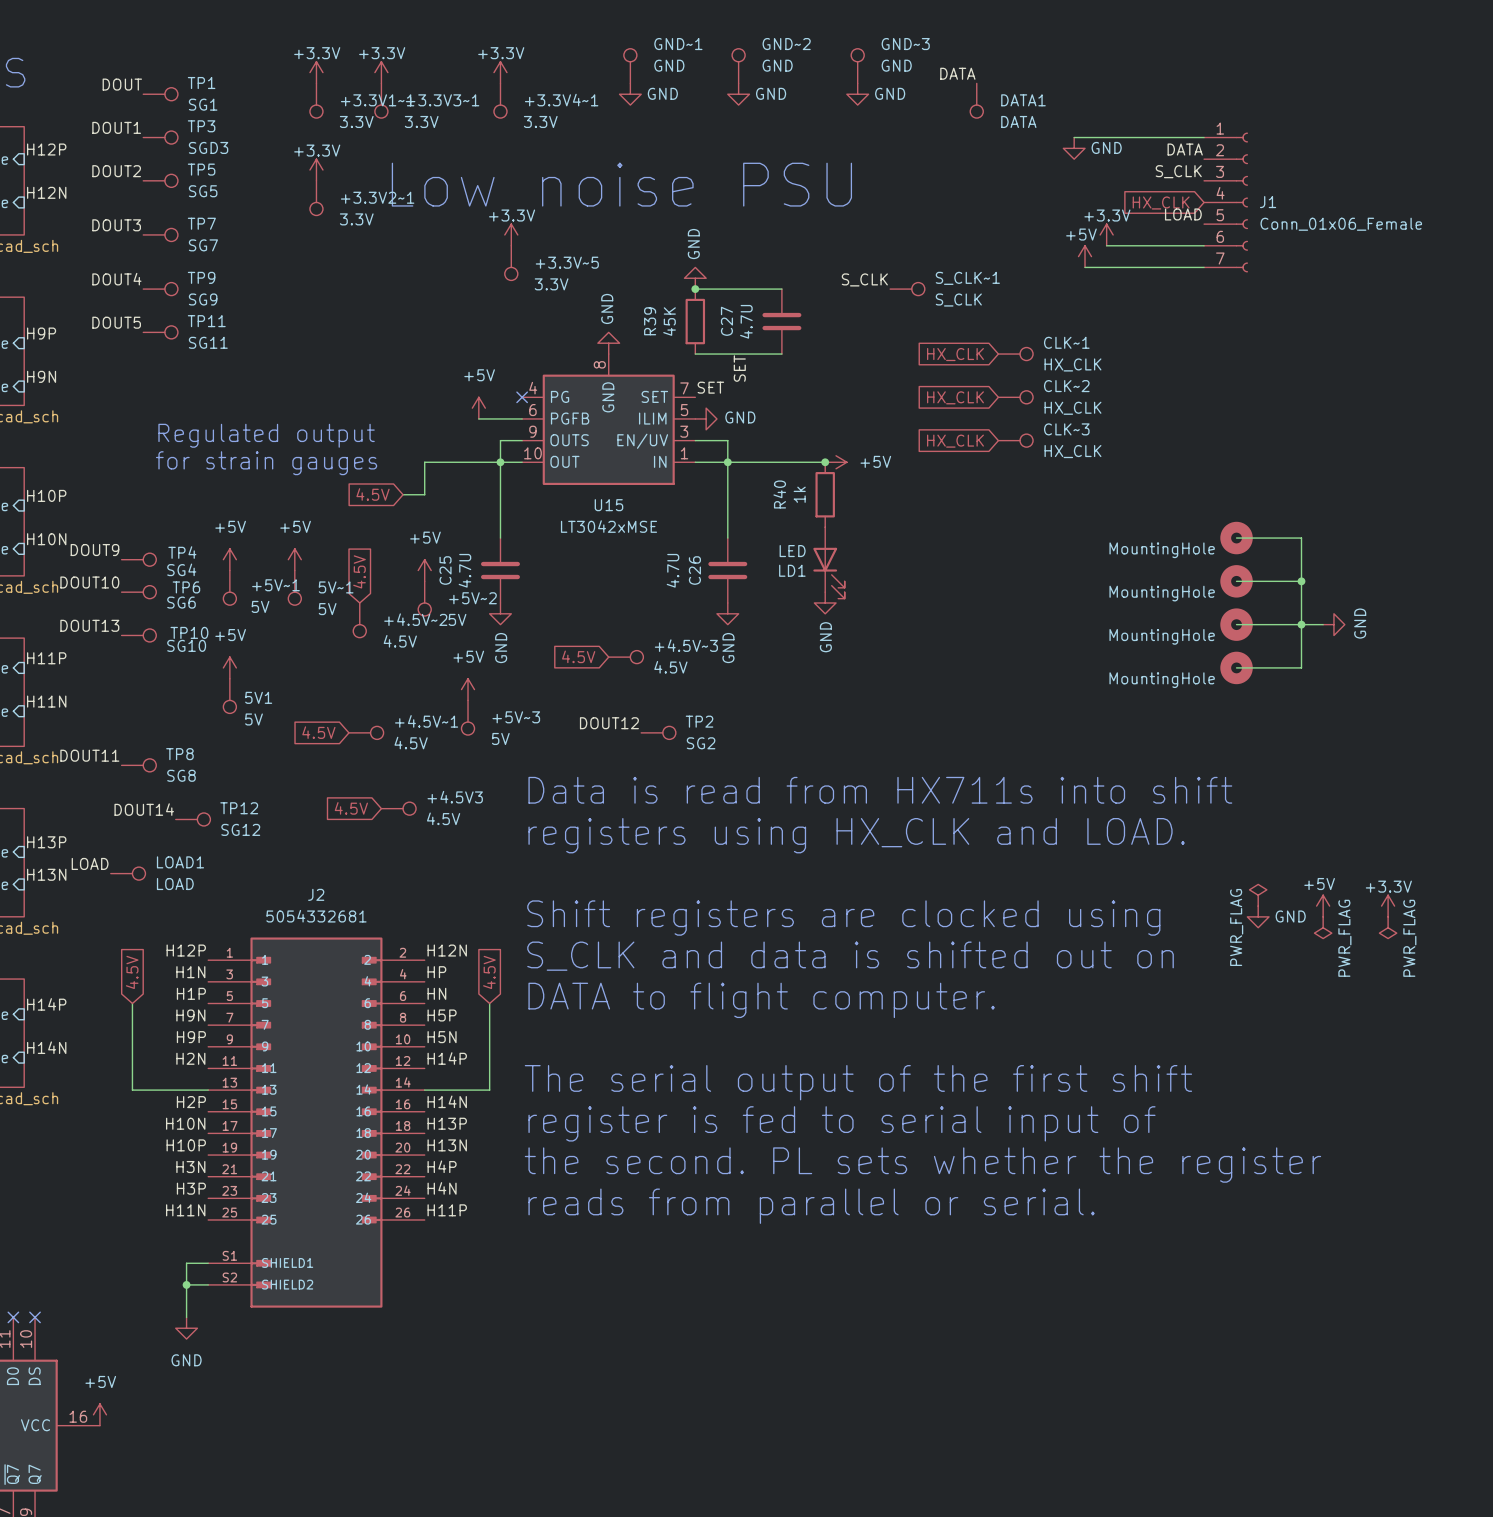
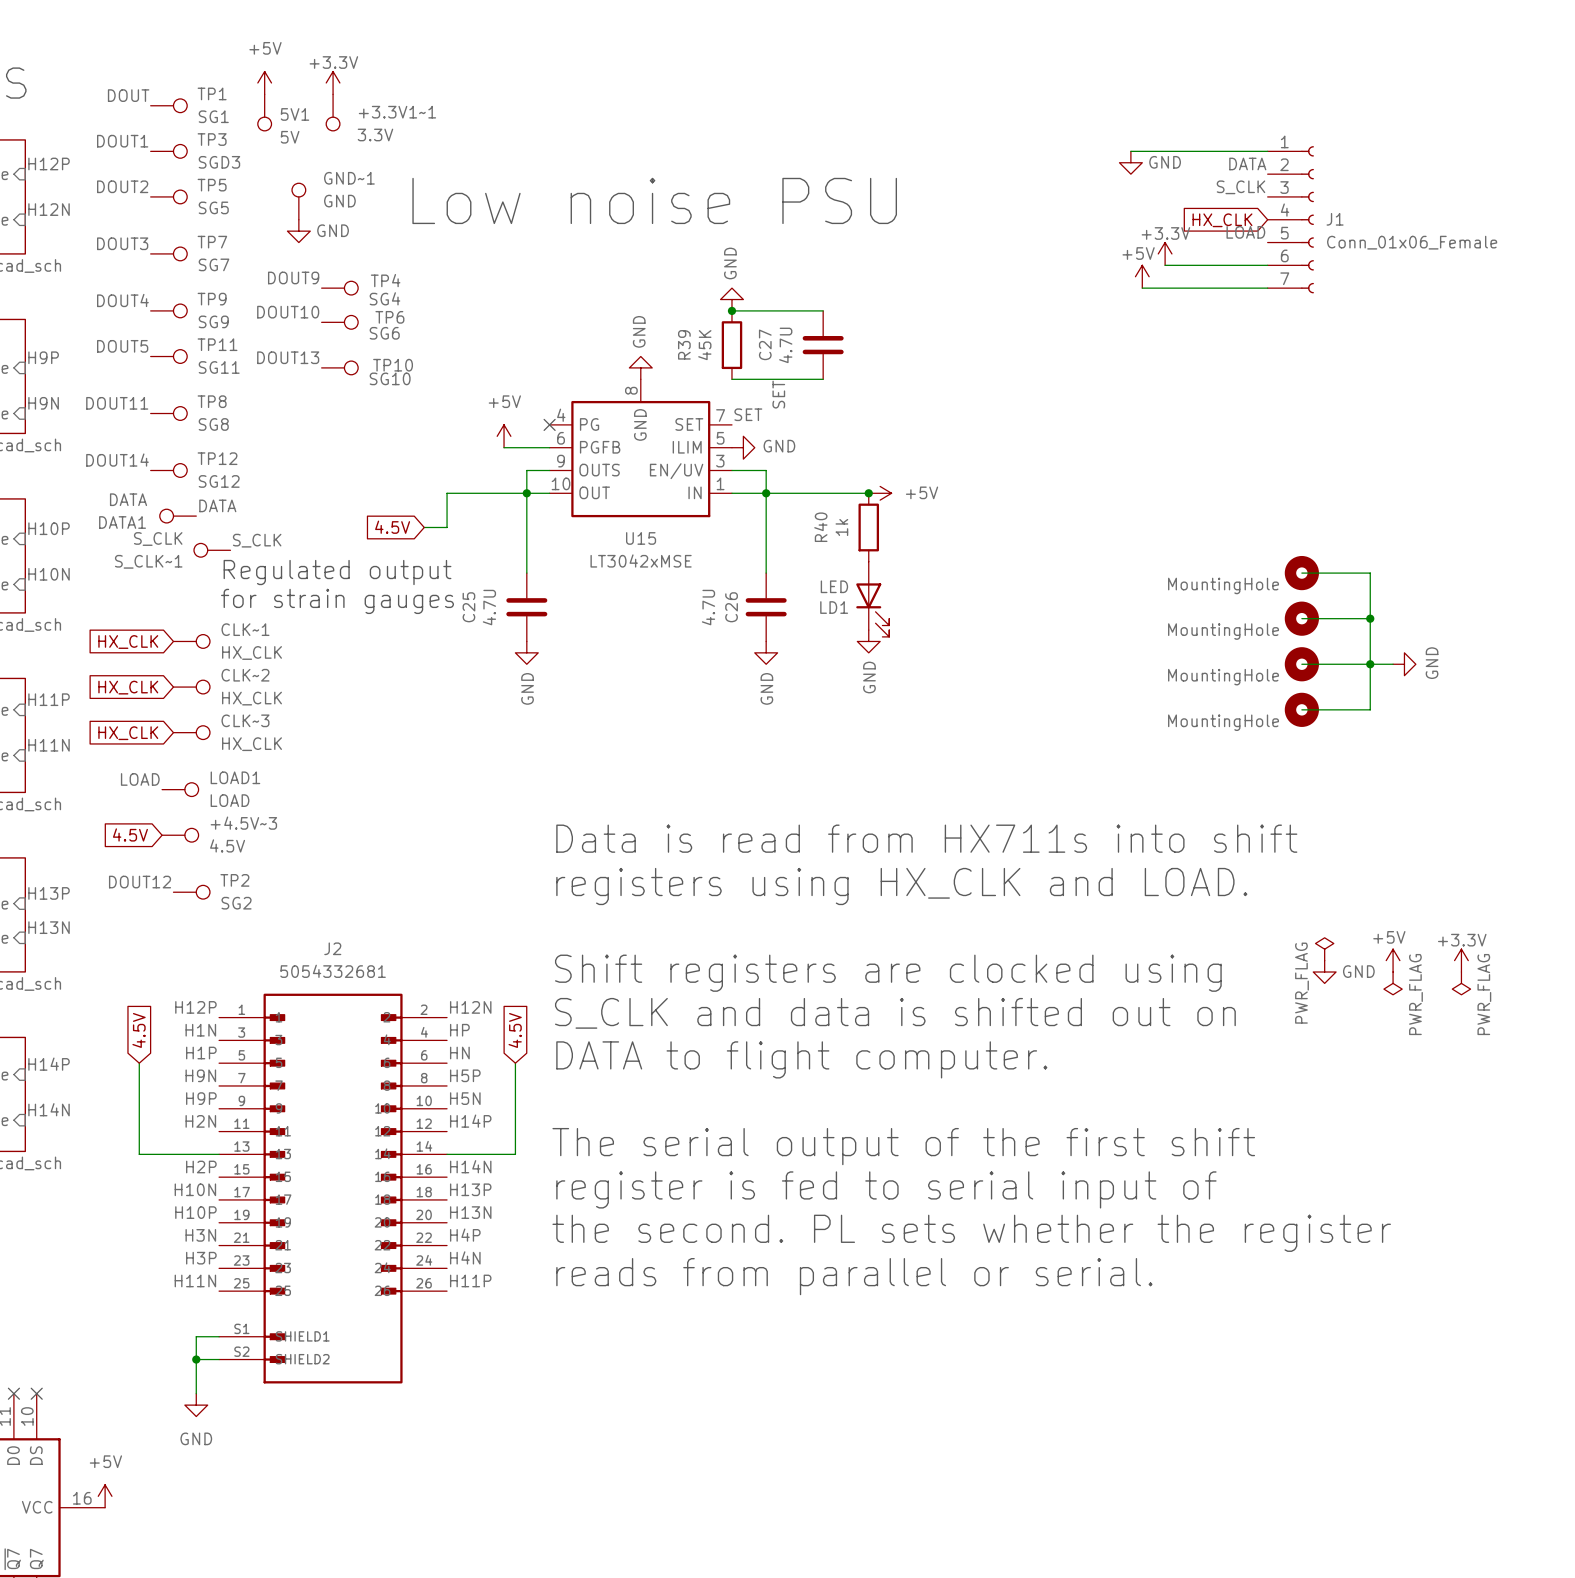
GND~1 position: (630, 66) -> (298, 201)
GND~2: GND (738, 66) -> none
GND~3: GND (857, 66) -> none
power symbol: none -> +5V (264, 82)
power symbol: +3.3V (381, 72) -> none
power symbol: +3.3V (500, 72) -> none
label: DATA (957, 73) -> none
power symbol: GND (630, 94) -> none
power symbol: GND (738, 94) -> none
power symbol: GND (857, 94) -> none
+3.3V3~1: 3.3V (381, 100) -> none
+3.3V4~1: 3.3V (500, 100) -> none
DATA1 position: (976, 100) -> (178, 516)
DATA1 name position: DATA1 (1023, 100) -> DATA1 (122, 522)
DATA1 rotation: 0° (976, 111) -> 90° clockwise (166, 516)
DATA1 value position: DATA (1018, 121) -> DATA (128, 499)
power symbol: +3.3V (316, 170) -> none
+3.3V2~1: 3.3V (316, 198) -> none
power symbol: none -> GND (298, 231)
power symbol: +3.3V (511, 234) -> none
label: none -> DOUT9 (293, 277)
+3.3V~5: 3.3V (511, 263) -> none
label: S_CLK (864, 279) -> none
S_CLK~1 position: (907, 289) -> (212, 550)
S_CLK~1 rotation: 0° (918, 289) -> 180° (200, 550)
label: none -> DOUT10 (288, 312)
label: none -> DOUT13 (288, 357)
global label: HX_CLK (955, 354) -> none
CLK~1 position: (1015, 354) -> (191, 641)
label: none -> DOUT11 (117, 403)
global label: HX_CLK (955, 397) -> none
CLK~2 position: (1015, 397) -> (191, 687)
label: none -> DOUT14 (117, 460)
text position: Regulated output (266, 435) -> Regulated output (337, 572)
CLK~3 position: (1015, 440) -> (191, 732)
global label: HX_CLK (955, 441) -> none
text position: for strain gauges (266, 463) -> for strain gauges (337, 601)
label: none -> DATA (217, 505)
label: none -> S_CLK (257, 540)
label: DOUT9 (94, 550) -> none
TP4 position: (138, 559) -> (339, 288)
power symbol: +5V (229, 559) -> none
power symbol: +5V (294, 559) -> none
power symbol: +5V (424, 570) -> none
global label: 4.5V (359, 571) -> none
label: DOUT10 (89, 582) -> none
+5V~1: 5V (229, 587) -> none
5V~1: 5V (294, 587) -> none
TP6 position: (138, 592) -> (339, 322)
+5V~2: 5V (424, 598) -> none
global label: none -> HX_CLK (128, 642)
+4.5V~2: 4.5V (359, 620) -> none
label: DOUT13 (89, 625) -> none
TP10 position: (138, 635) -> (339, 367)
global label: none -> HX_CLK (128, 687)
global label: 4.5V (578, 656) -> none
+4.5V~3 position: (626, 657) -> (180, 835)
power symbol: +5V (229, 667) -> none
power symbol: +5V (468, 689) -> none
global label: none -> HX_CLK (128, 733)
5V1 position: (229, 696) -> (264, 112)
+5V~3: 5V (468, 717) -> none
label: DOUT12 (609, 723) -> none
global label: 4.5V (318, 732) -> none
+4.5V~1: 4.5V (366, 732) -> none
TP2 position: (658, 732) -> (191, 892)
label: DOUT11 (89, 755) -> none
TP8 position: (138, 765) -> (168, 413)
global label: none -> 4.5V (130, 834)
global label: 4.5V (351, 808) -> none
+4.5V3: 4.5V (398, 808) -> none
label: DOUT14 (144, 809) -> DOUT12 (140, 882)
TP12 position: (193, 819) -> (168, 470)
label position: LOAD (90, 863) -> LOAD (140, 779)
LOAD1 position: (128, 873) -> (180, 789)

